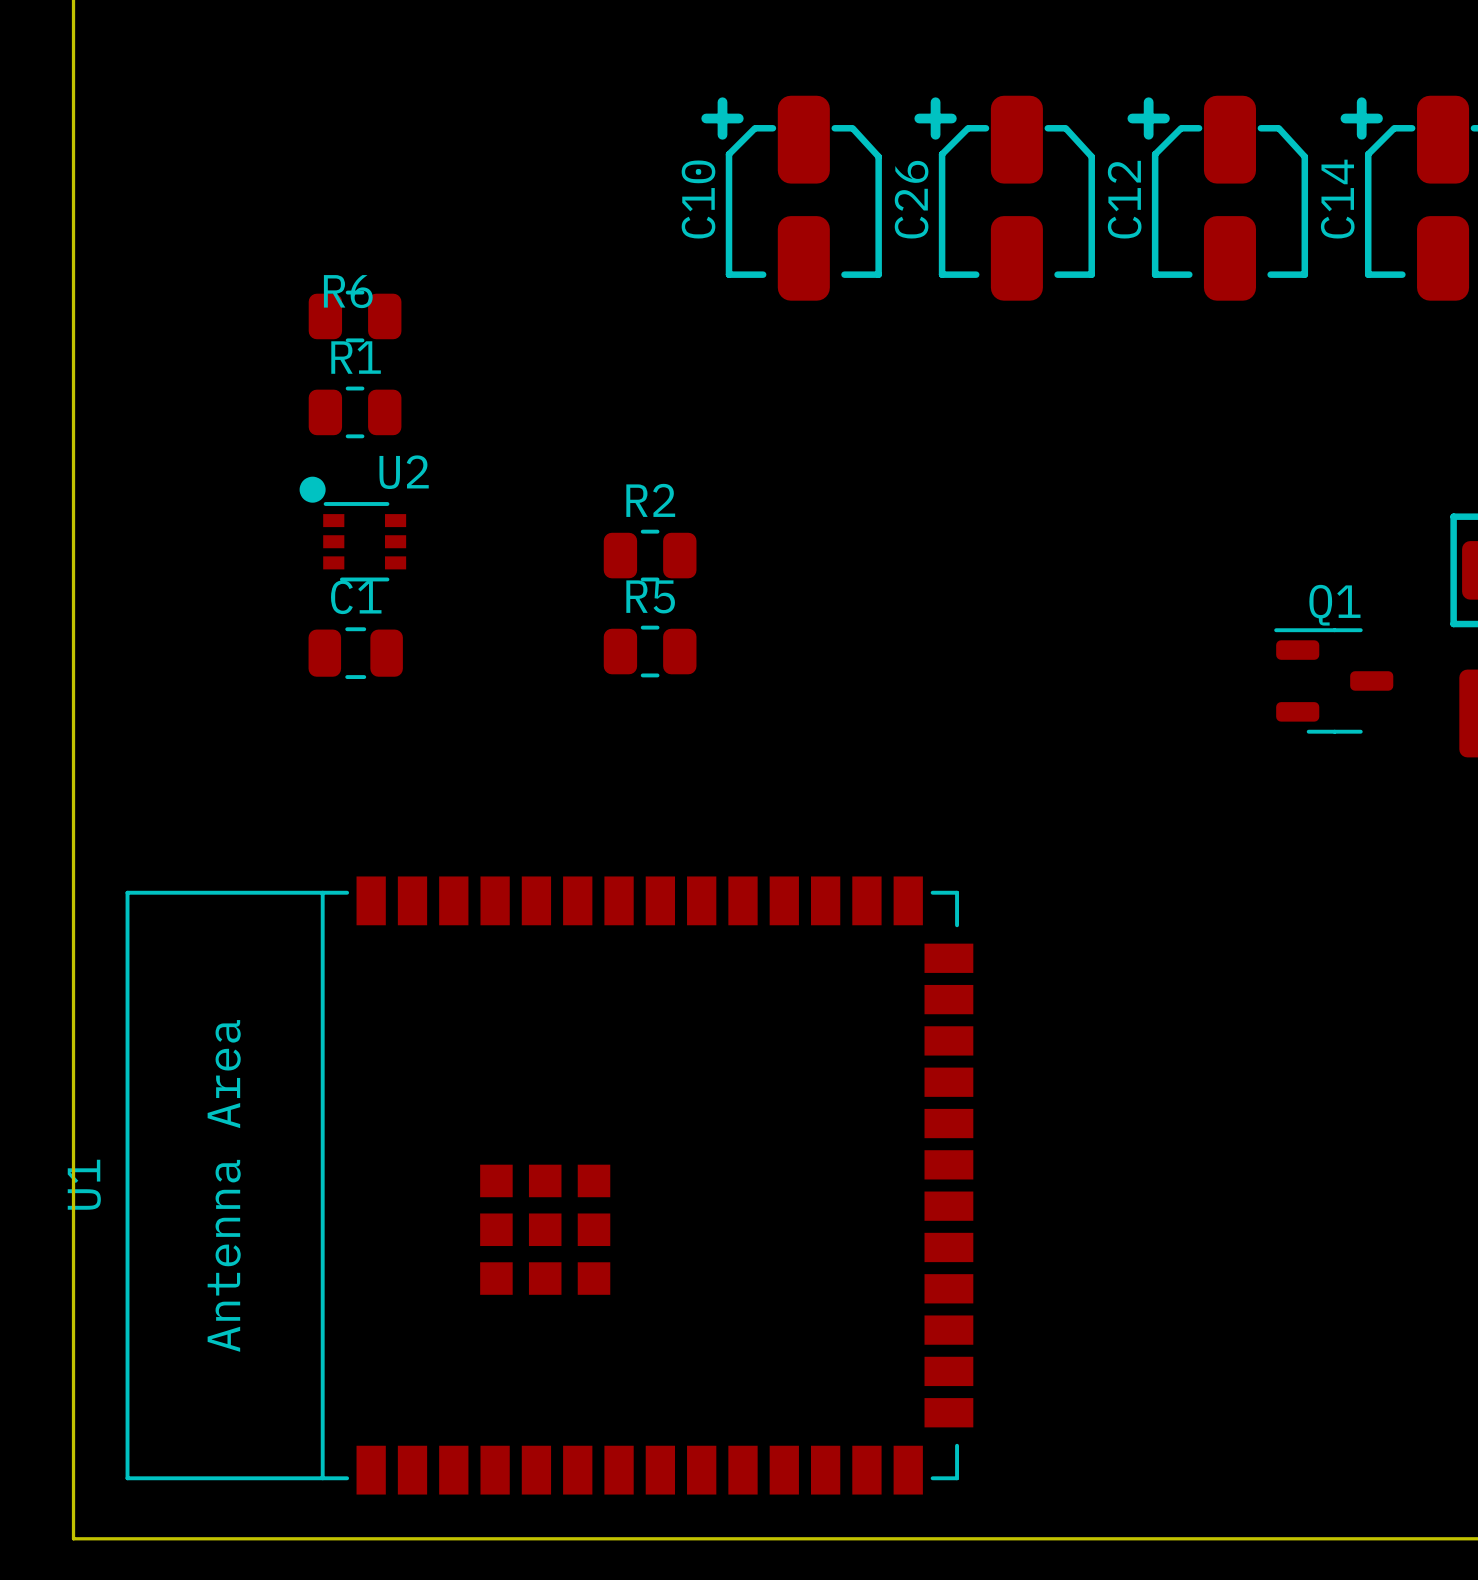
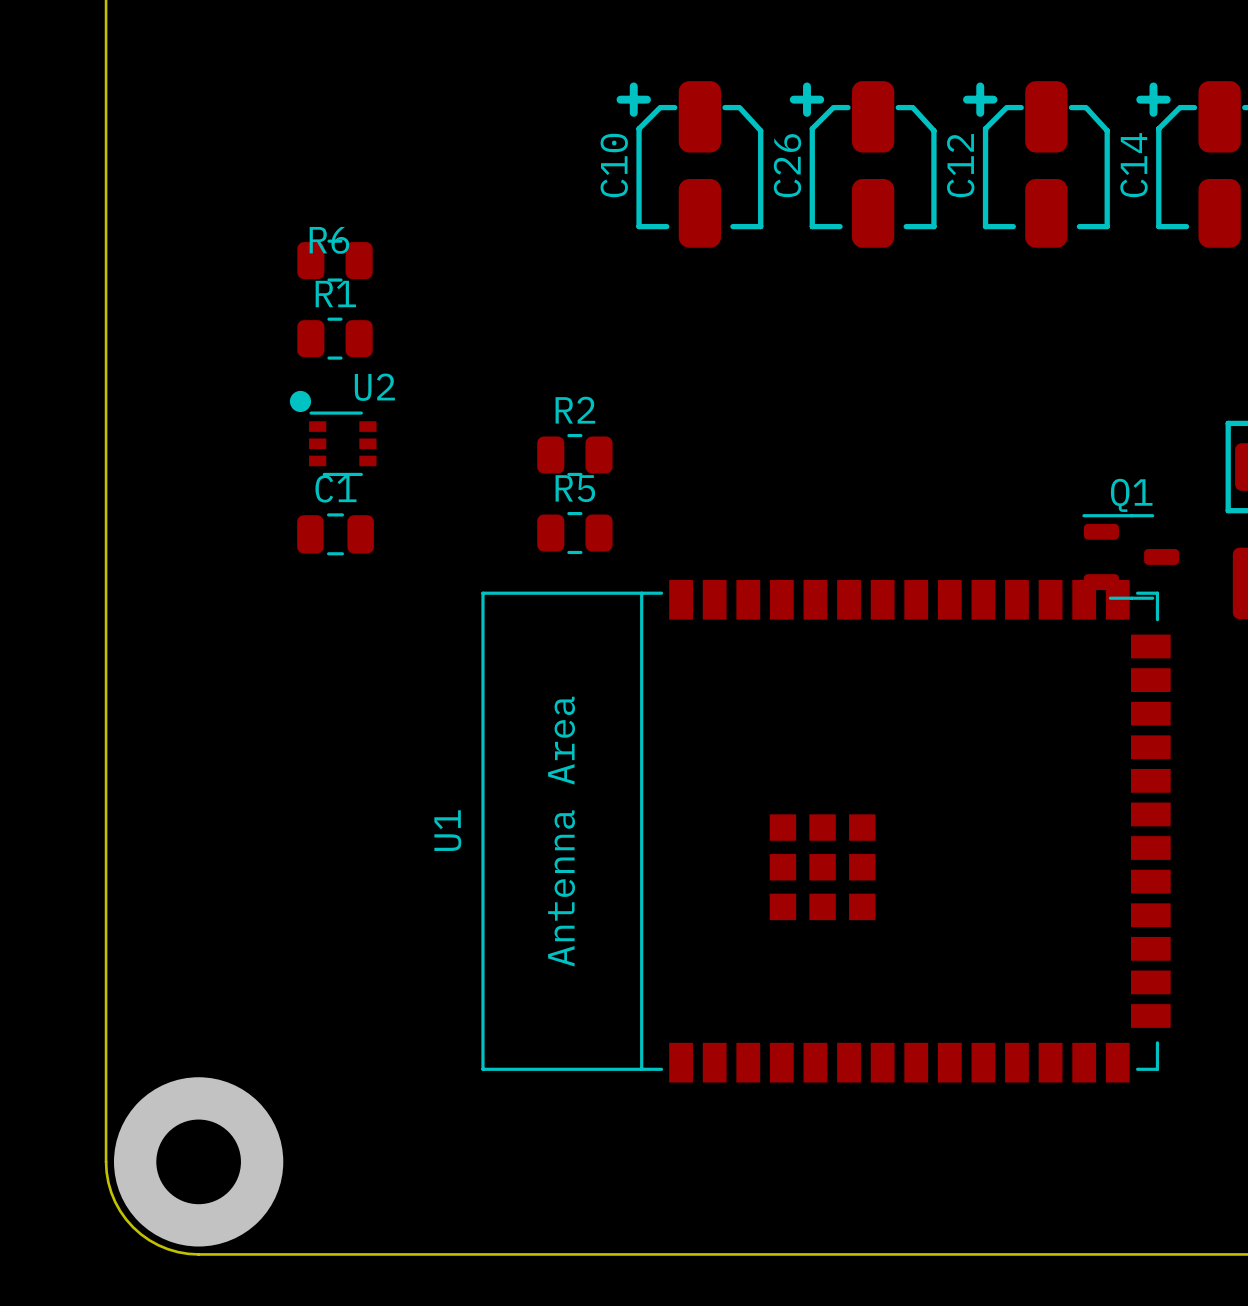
U1 position: (549, 1185) -> (826, 831)
board edge: (73, 1424) (73, 1538) (187, 1538) -> (106, 1161) (108, 1182) (115, 1202) (133, 1227) (158, 1245) (178, 1252) (198, 1254)
via: none -> (198, 1161)

